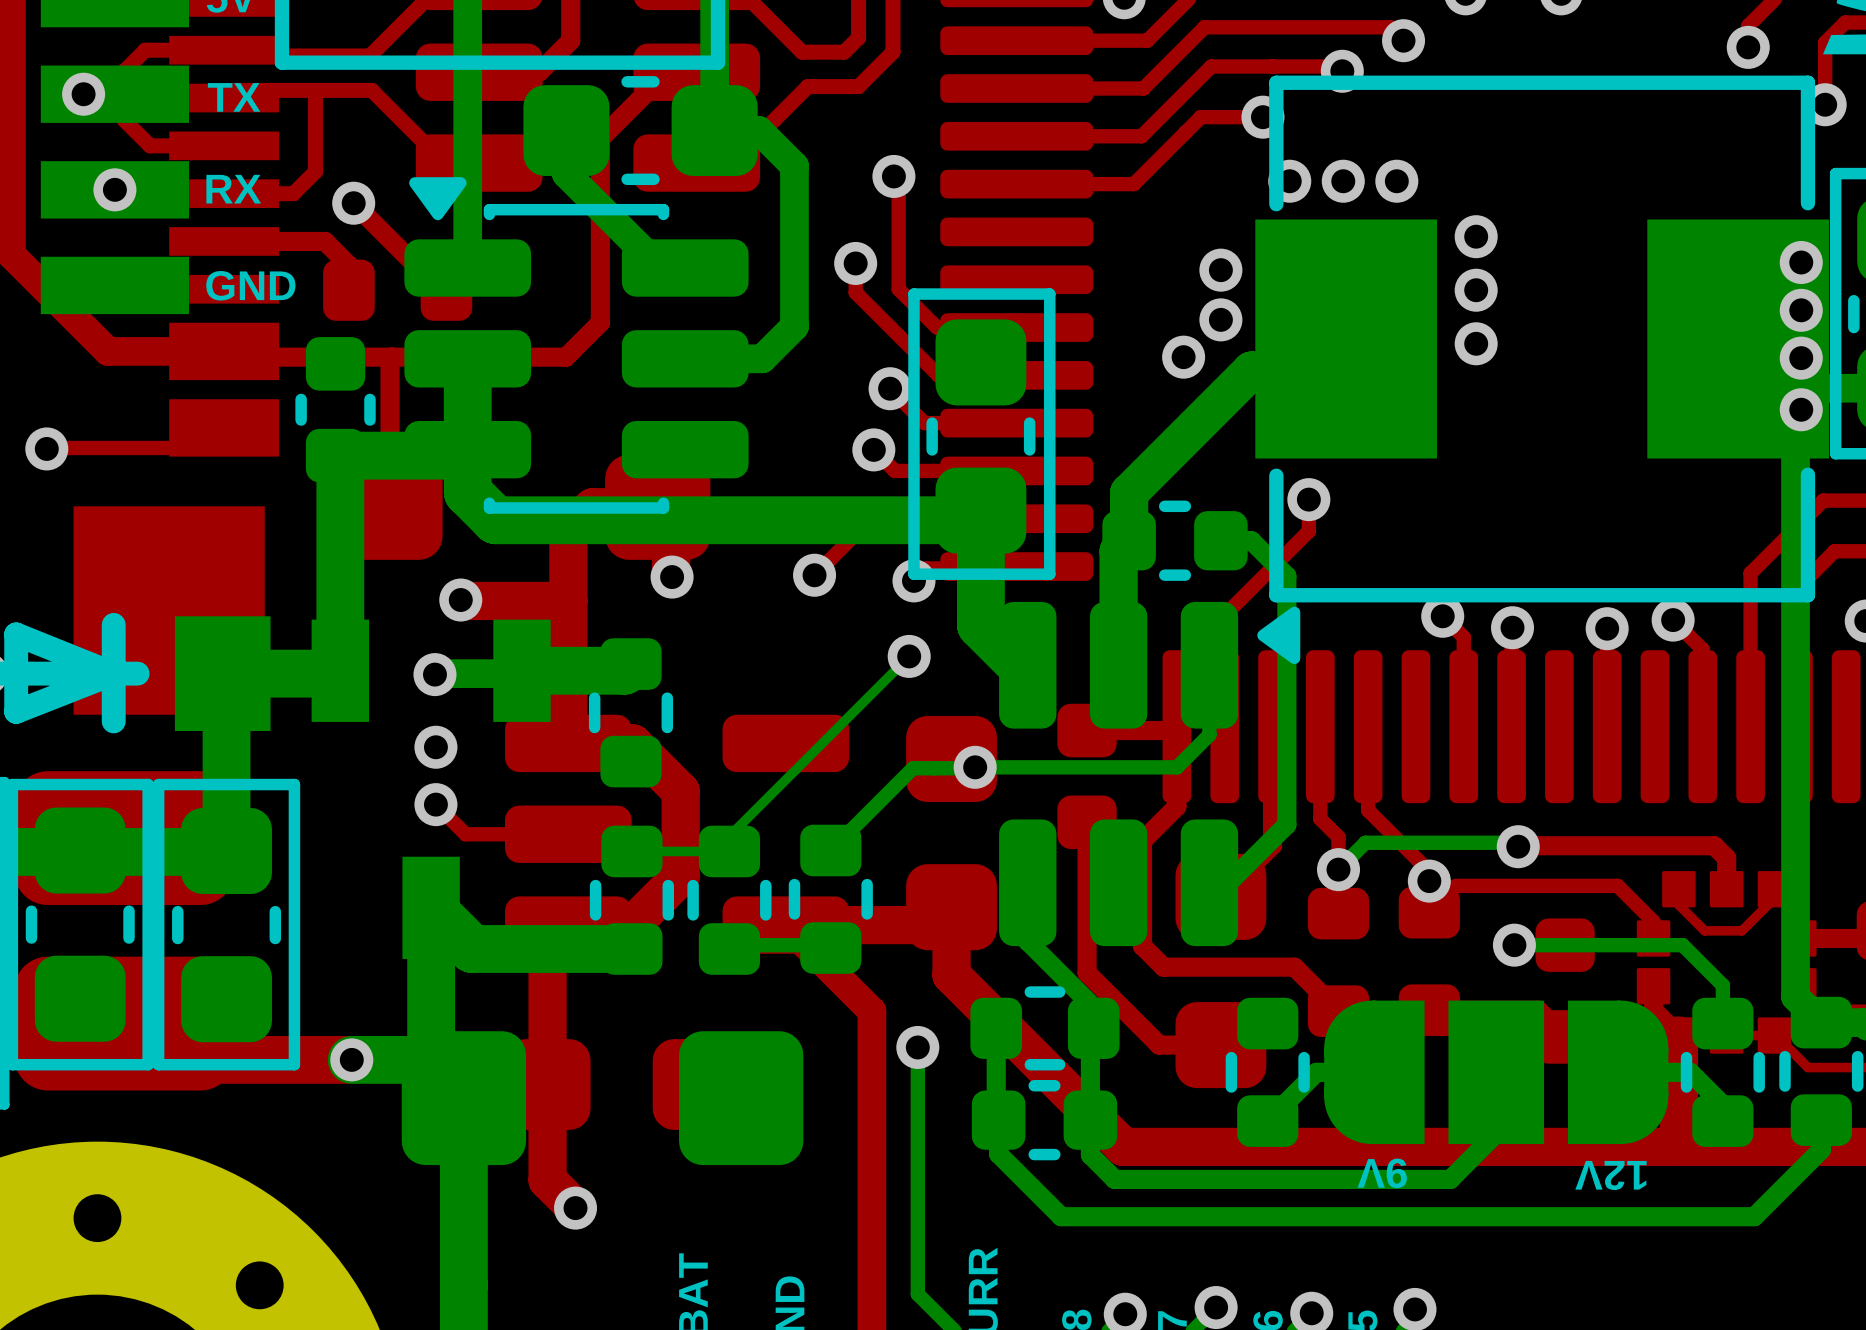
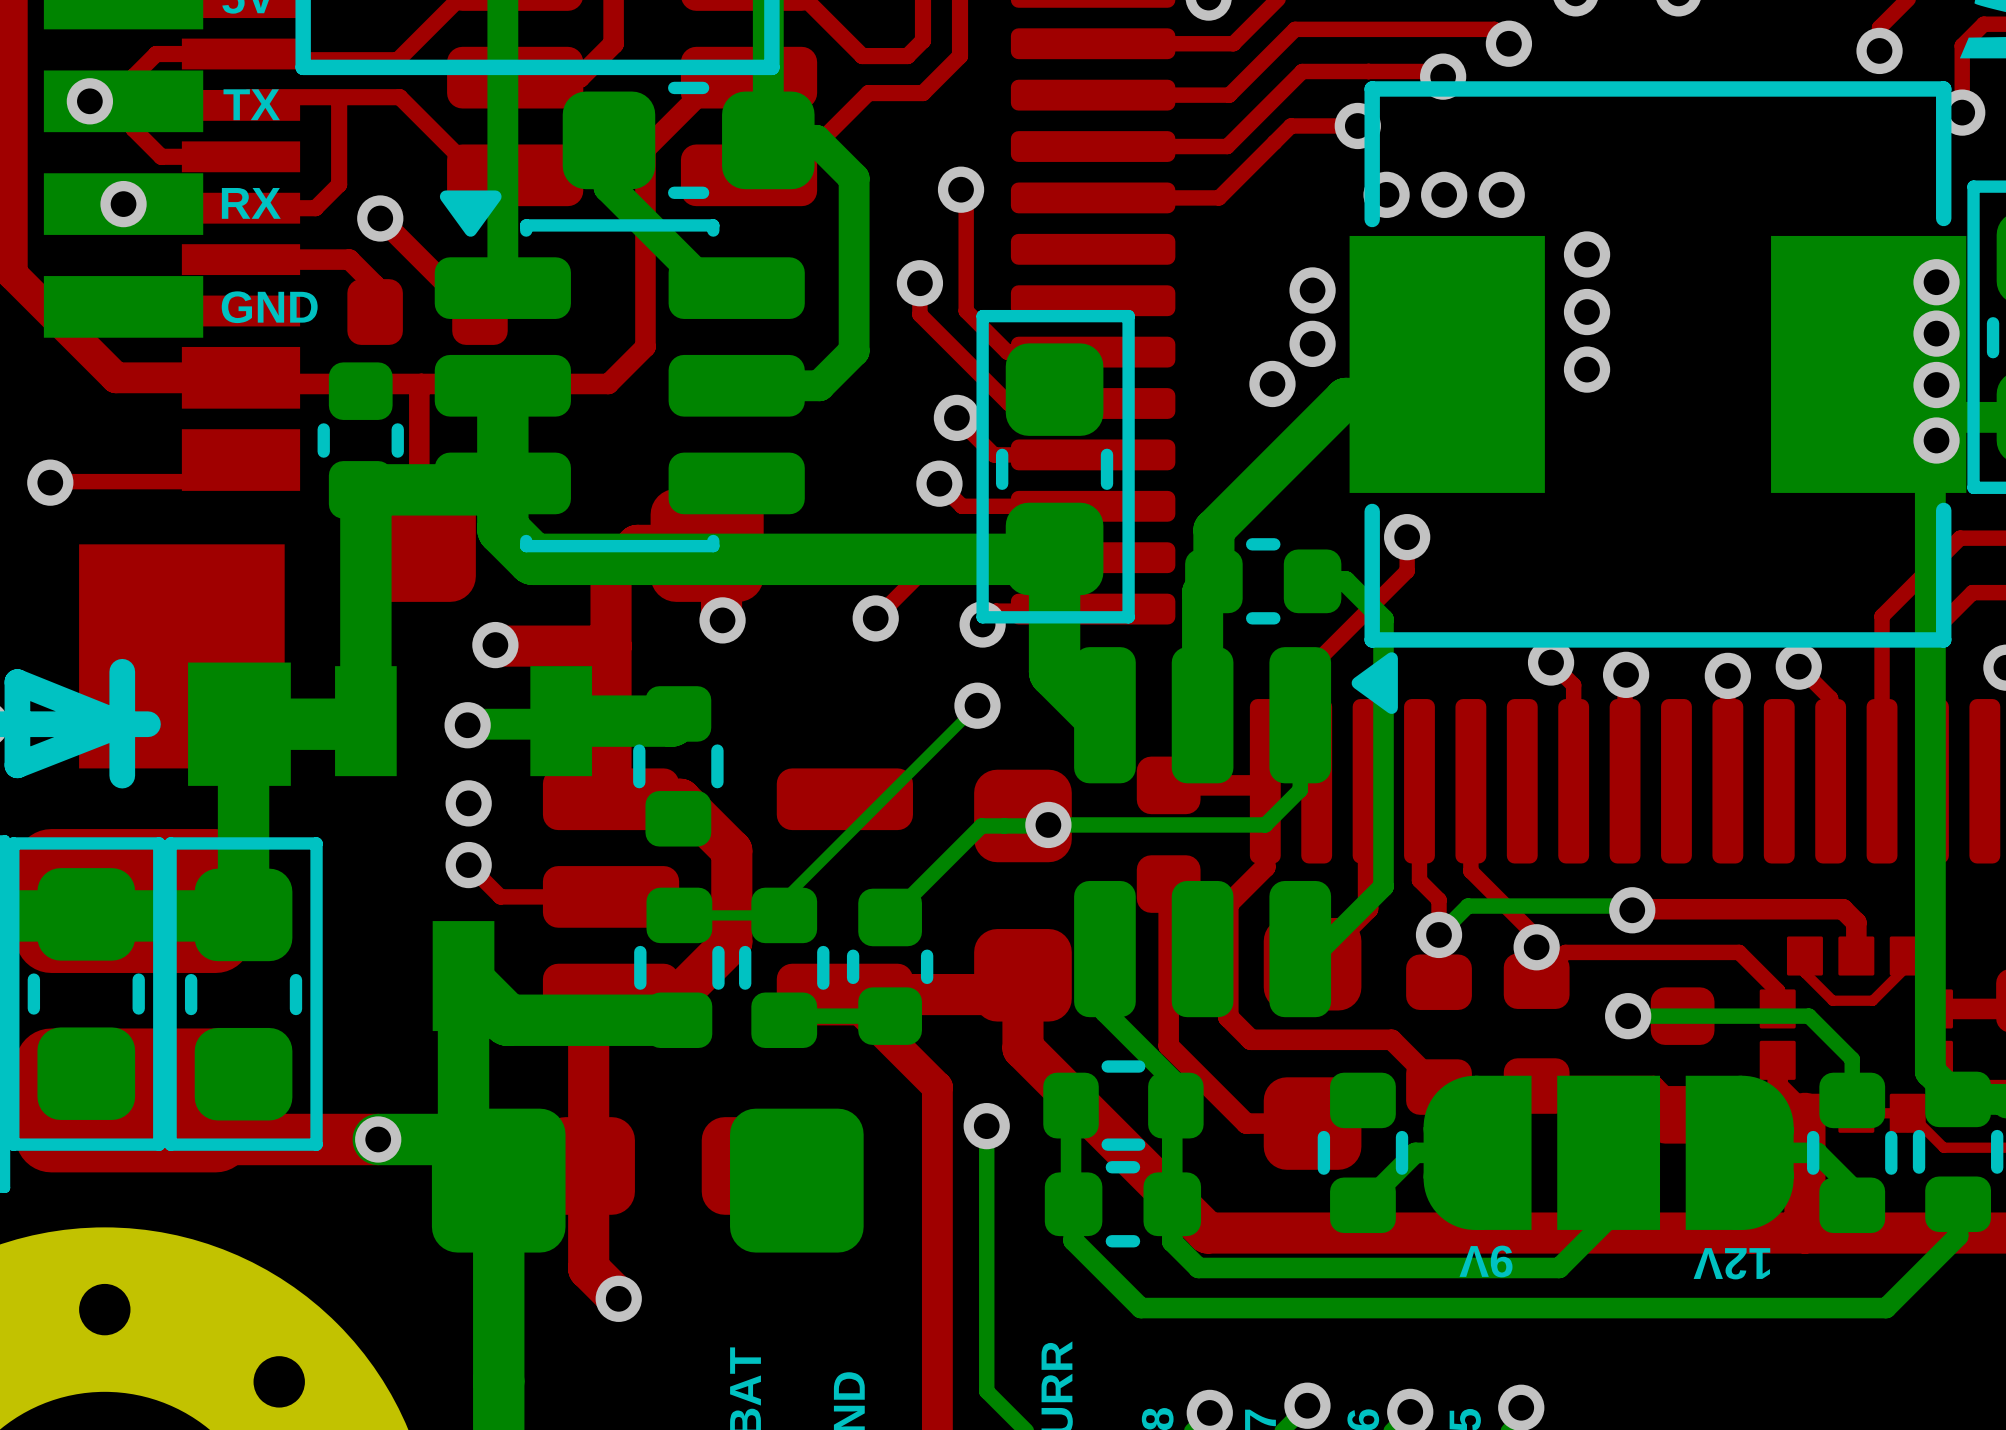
part footprint: [788, 824, 873, 974] -> [846, 888, 934, 1045]

